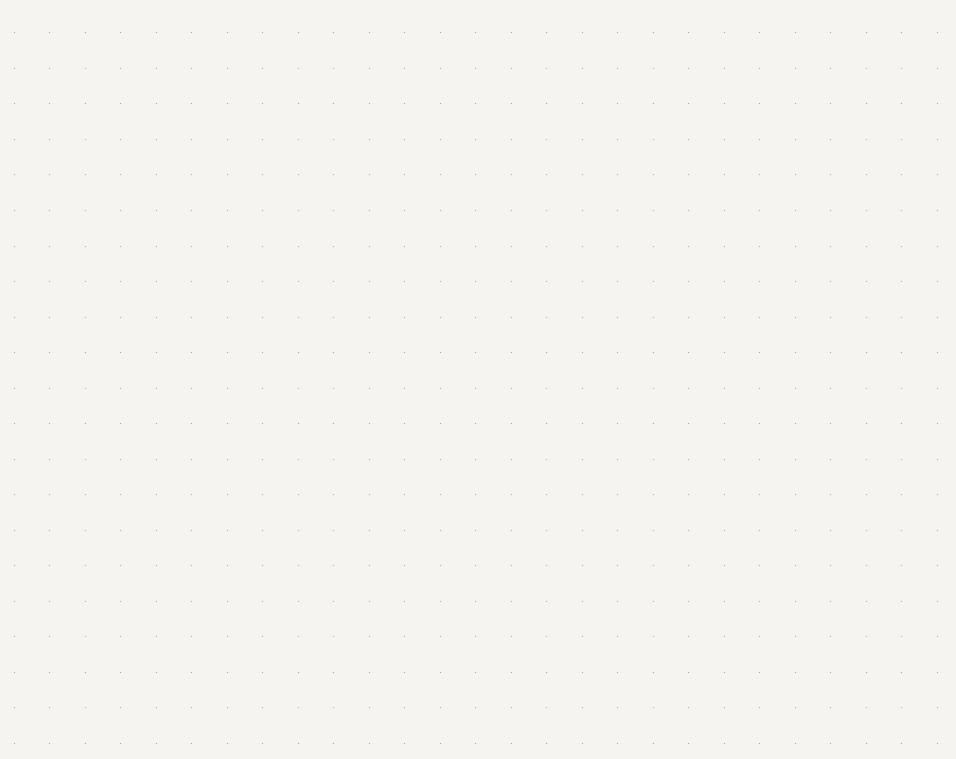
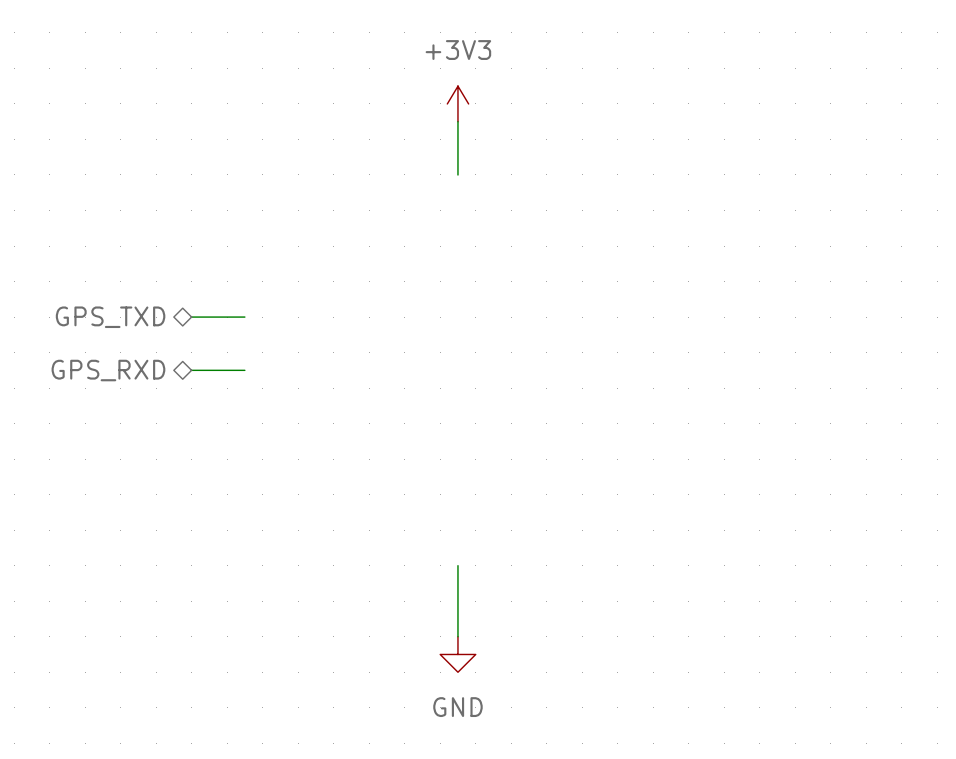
power symbol: none -> +3V3 (457, 103)
wire: none -> (457, 121) (457, 174)
hierarchical label: none -> GPS_TXD (110, 317)
wire: none -> (191, 317) (244, 317)
hierarchical label: none -> GPS_RXD (108, 370)
wire: none -> (191, 370) (244, 370)
wire: none -> (457, 565) (457, 636)
power symbol: none -> GND (457, 654)

